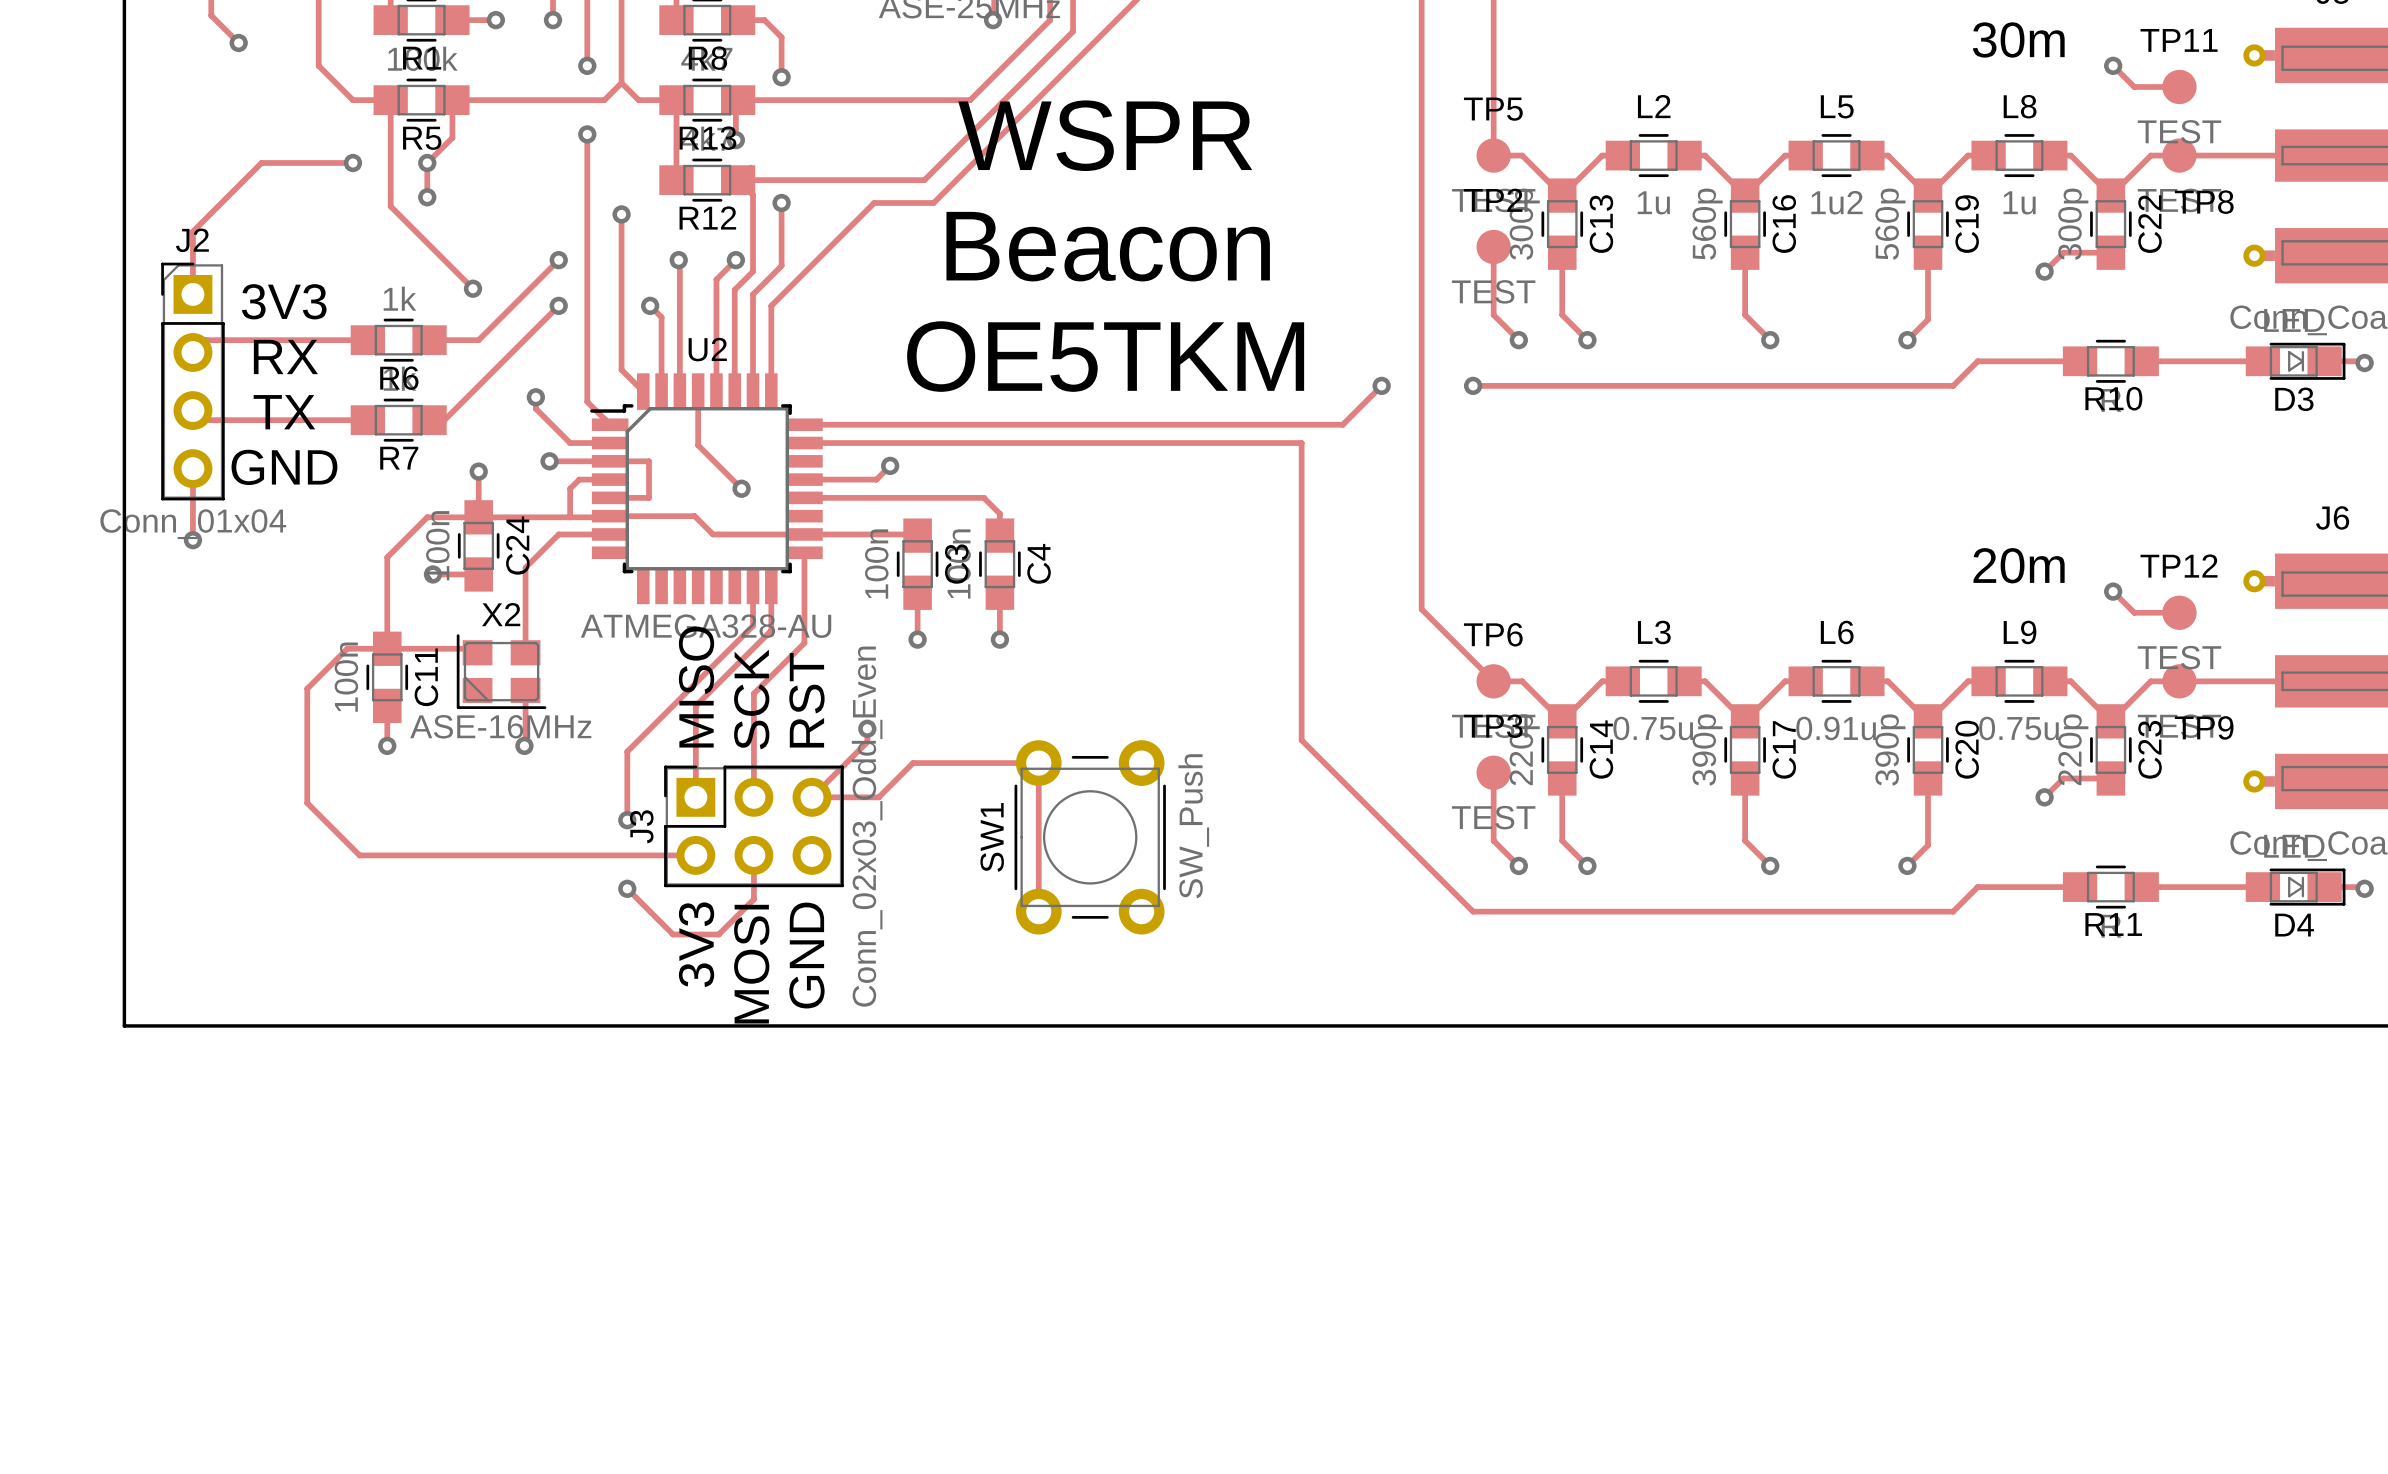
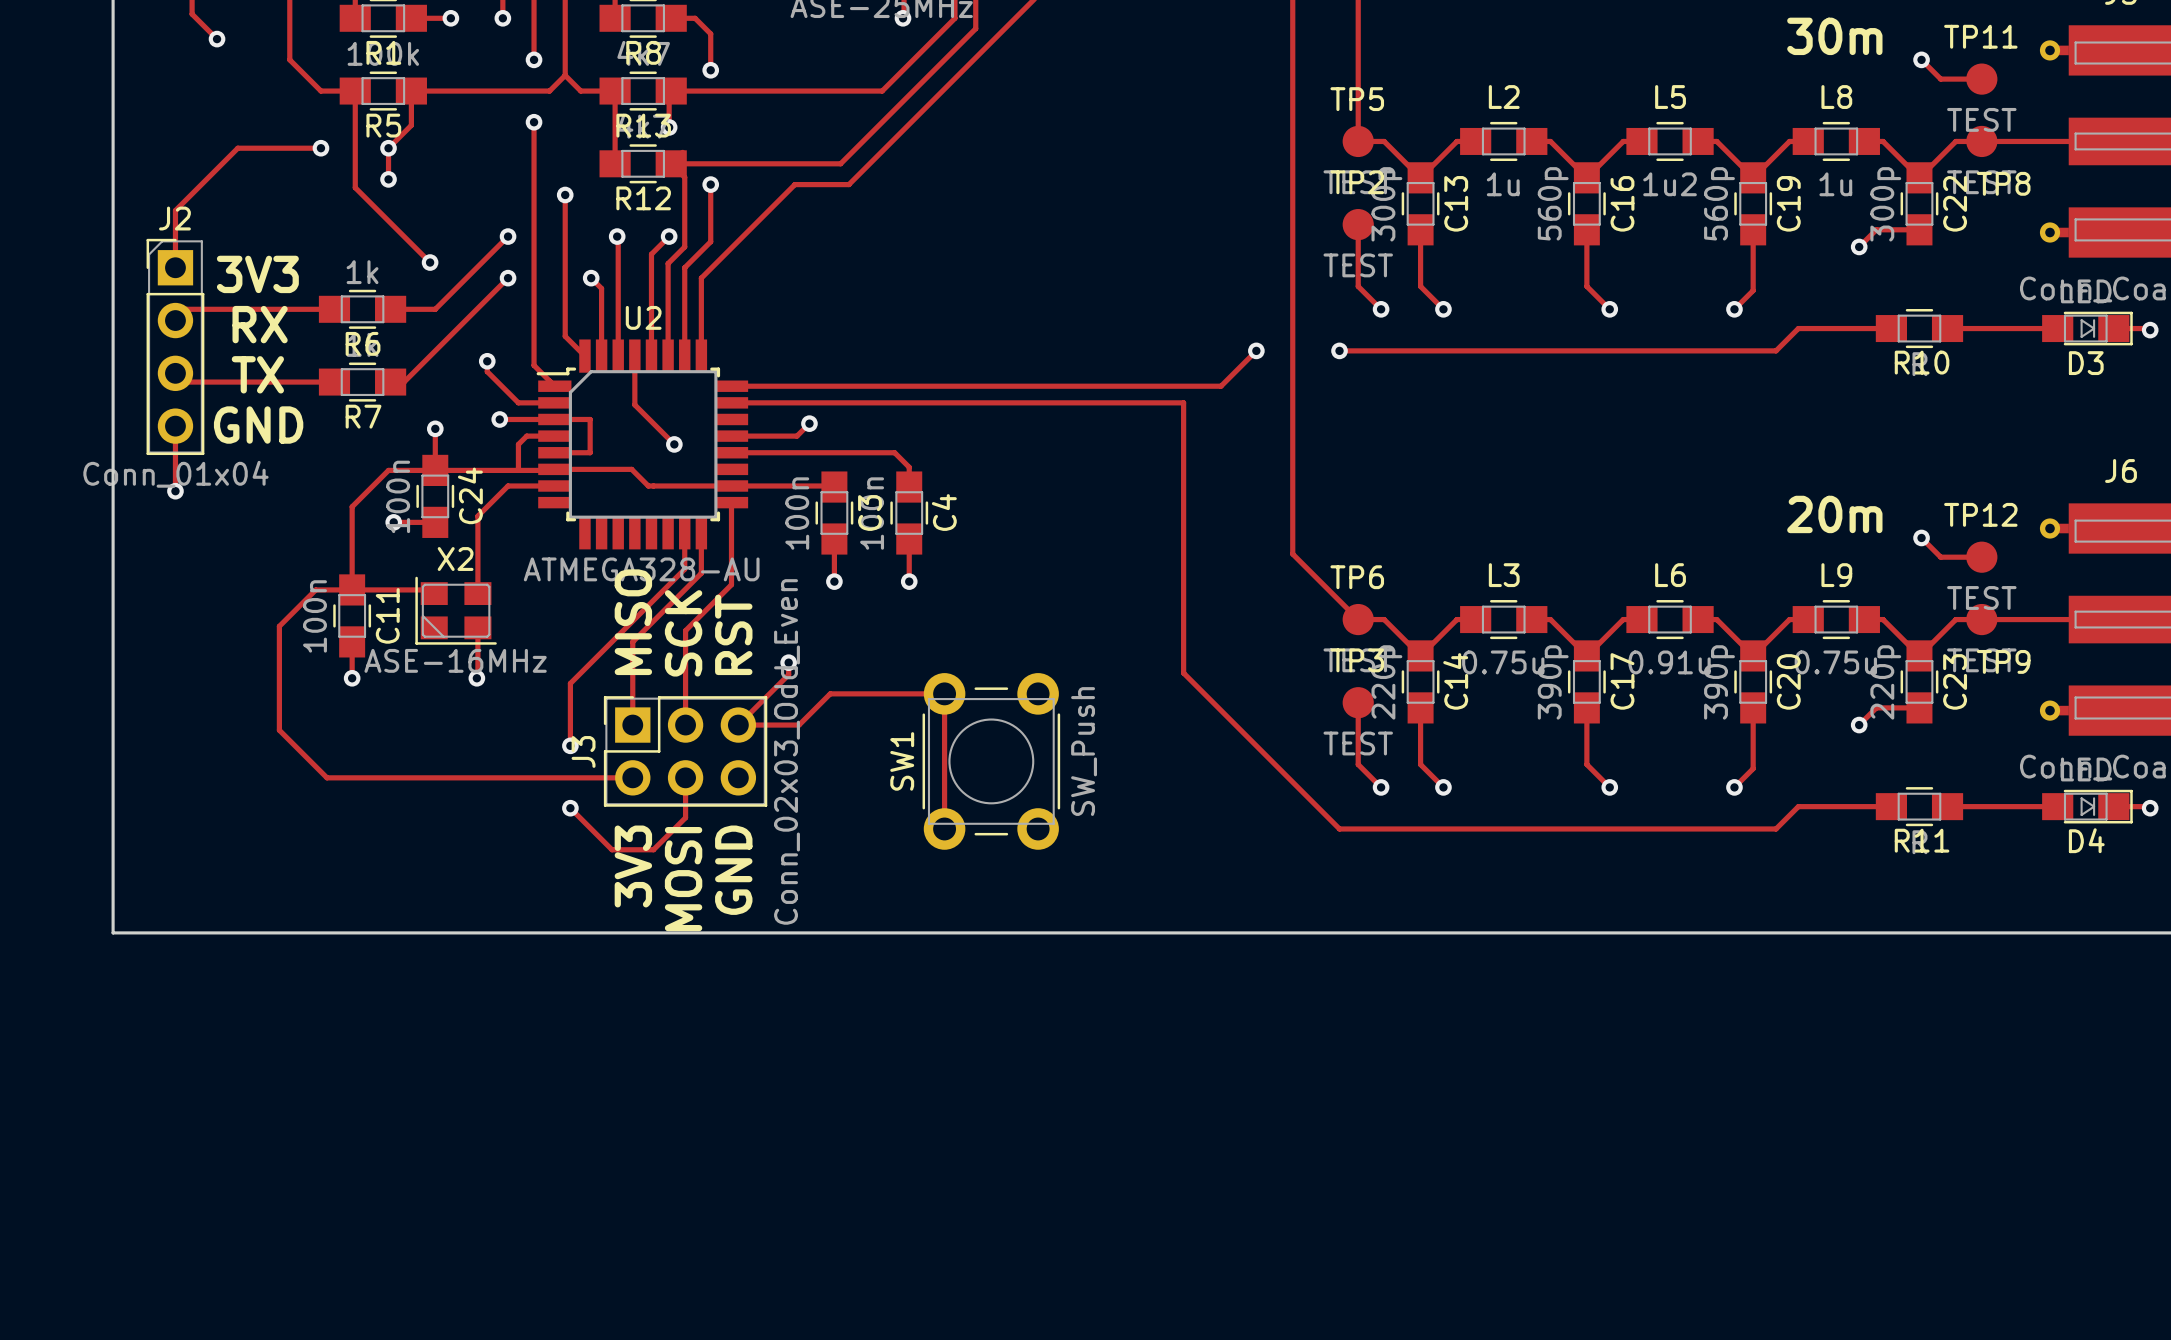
text: WSPR (1105, 135) -> none
text: Beacon (1108, 246) -> none
text: OE5TKM (1105, 356) -> none

